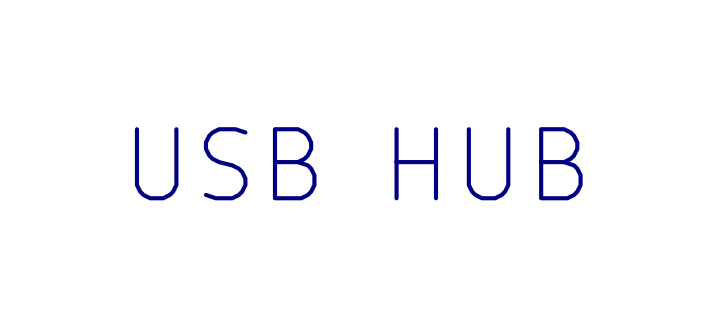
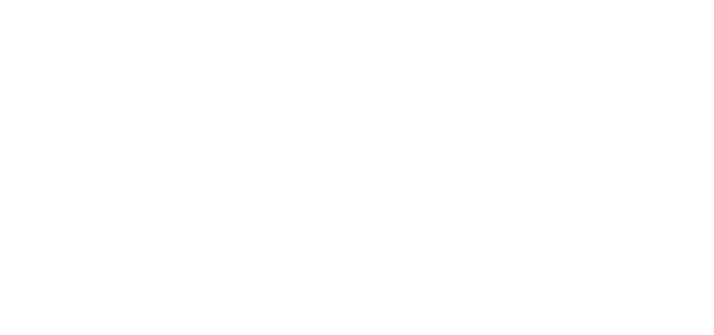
text: USB HUB (358, 163) -> none

